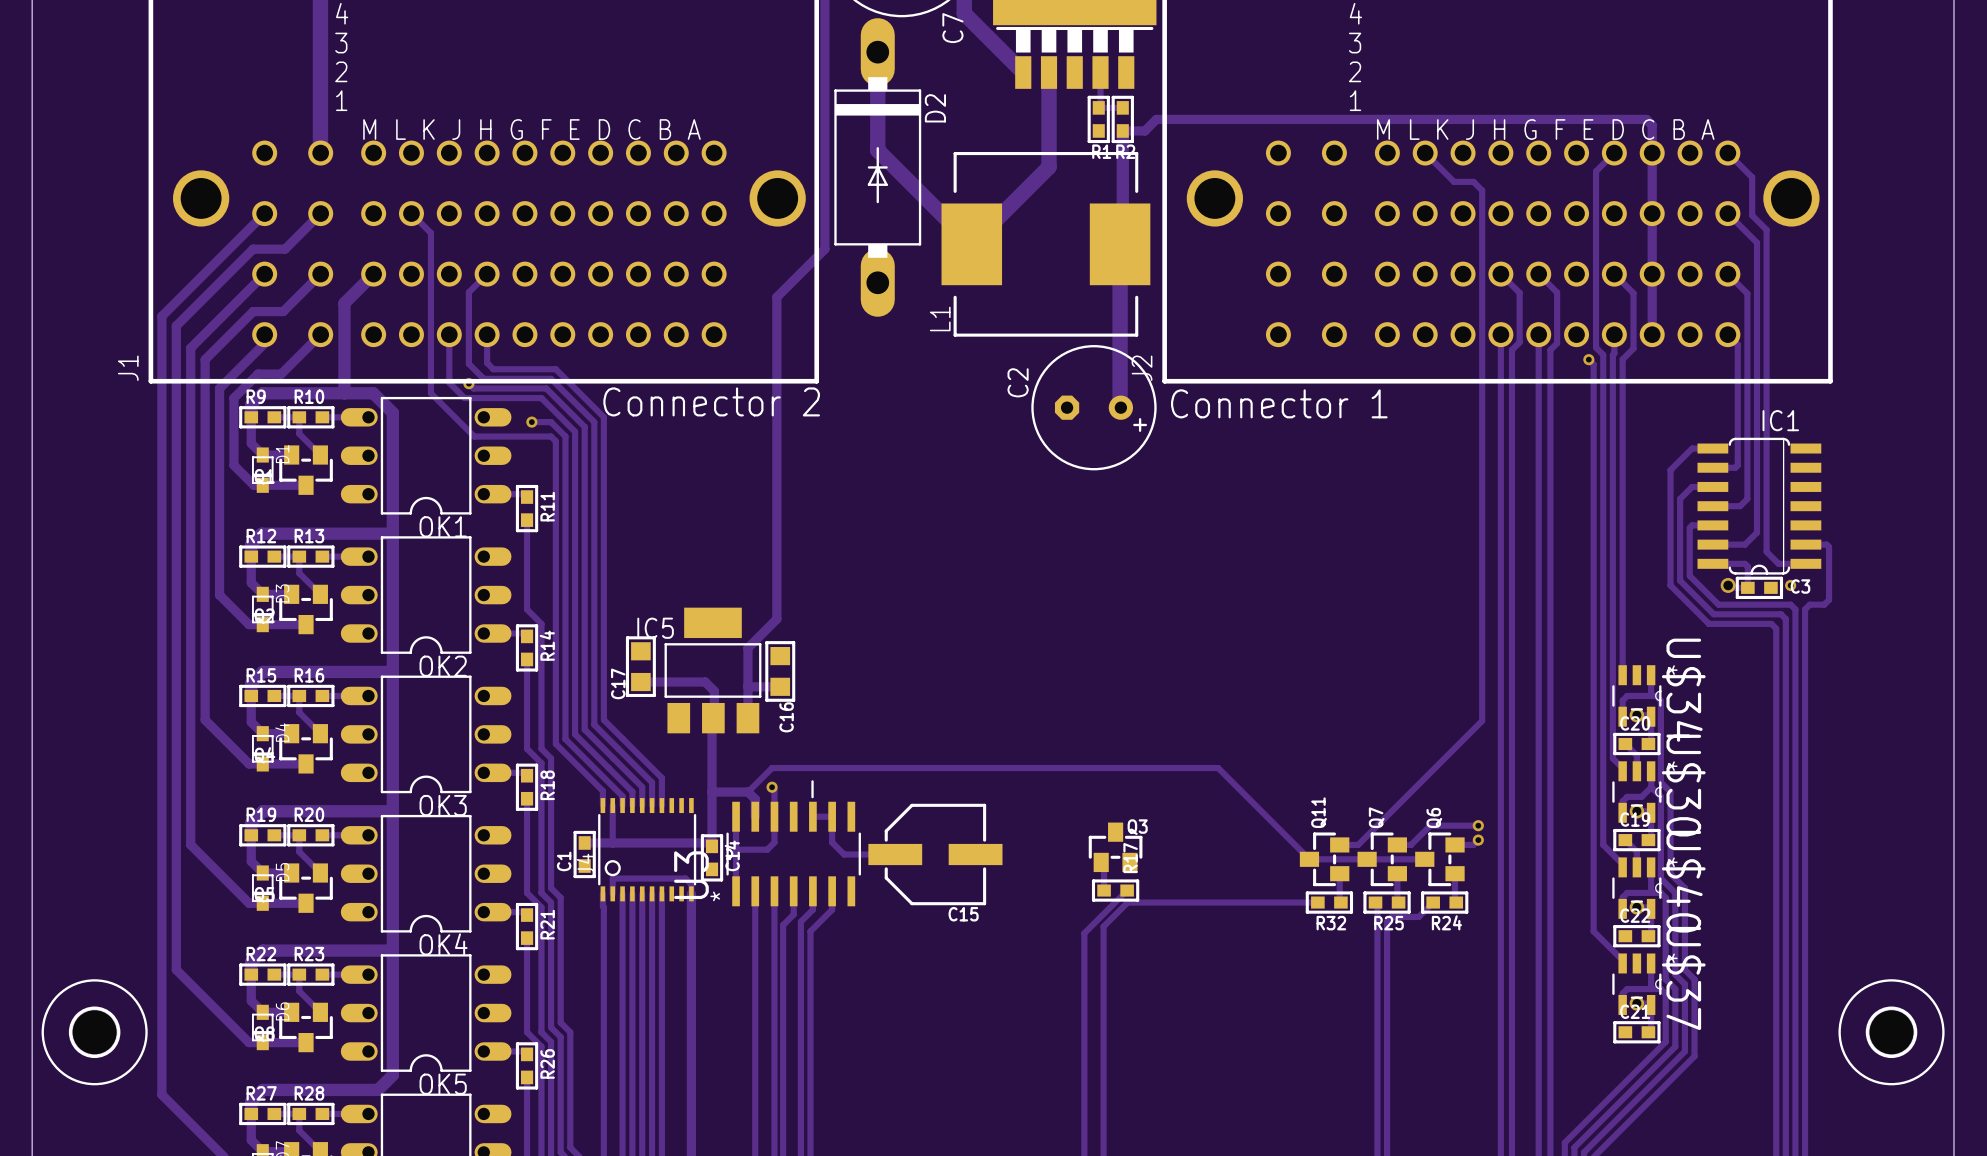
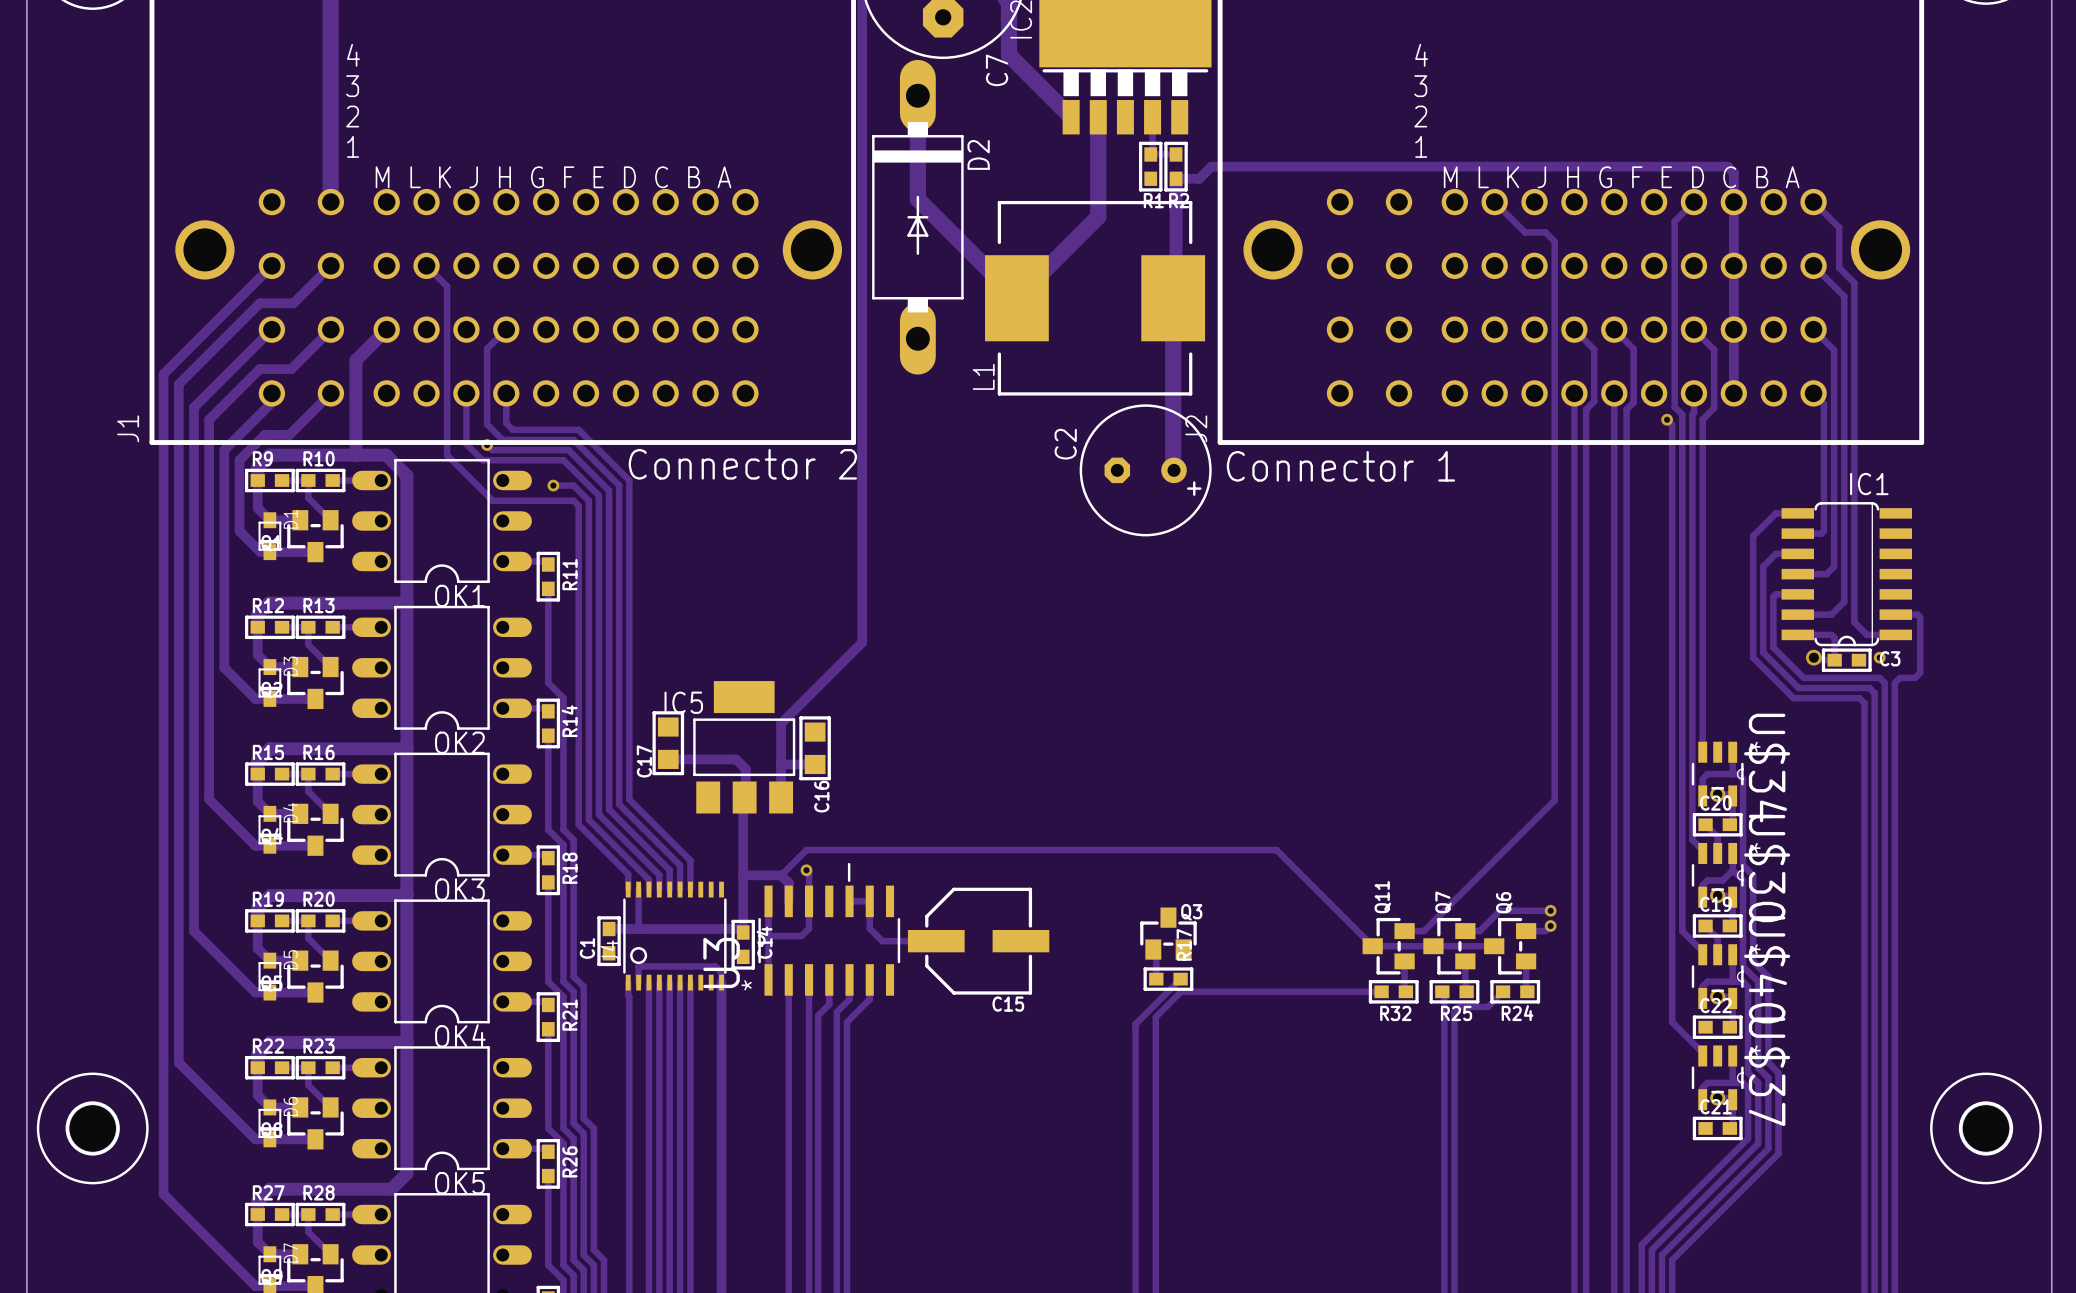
track: (824, 249) (776, 297) (776, 619) -> (862, 303) (862, 642) (811, 693)

